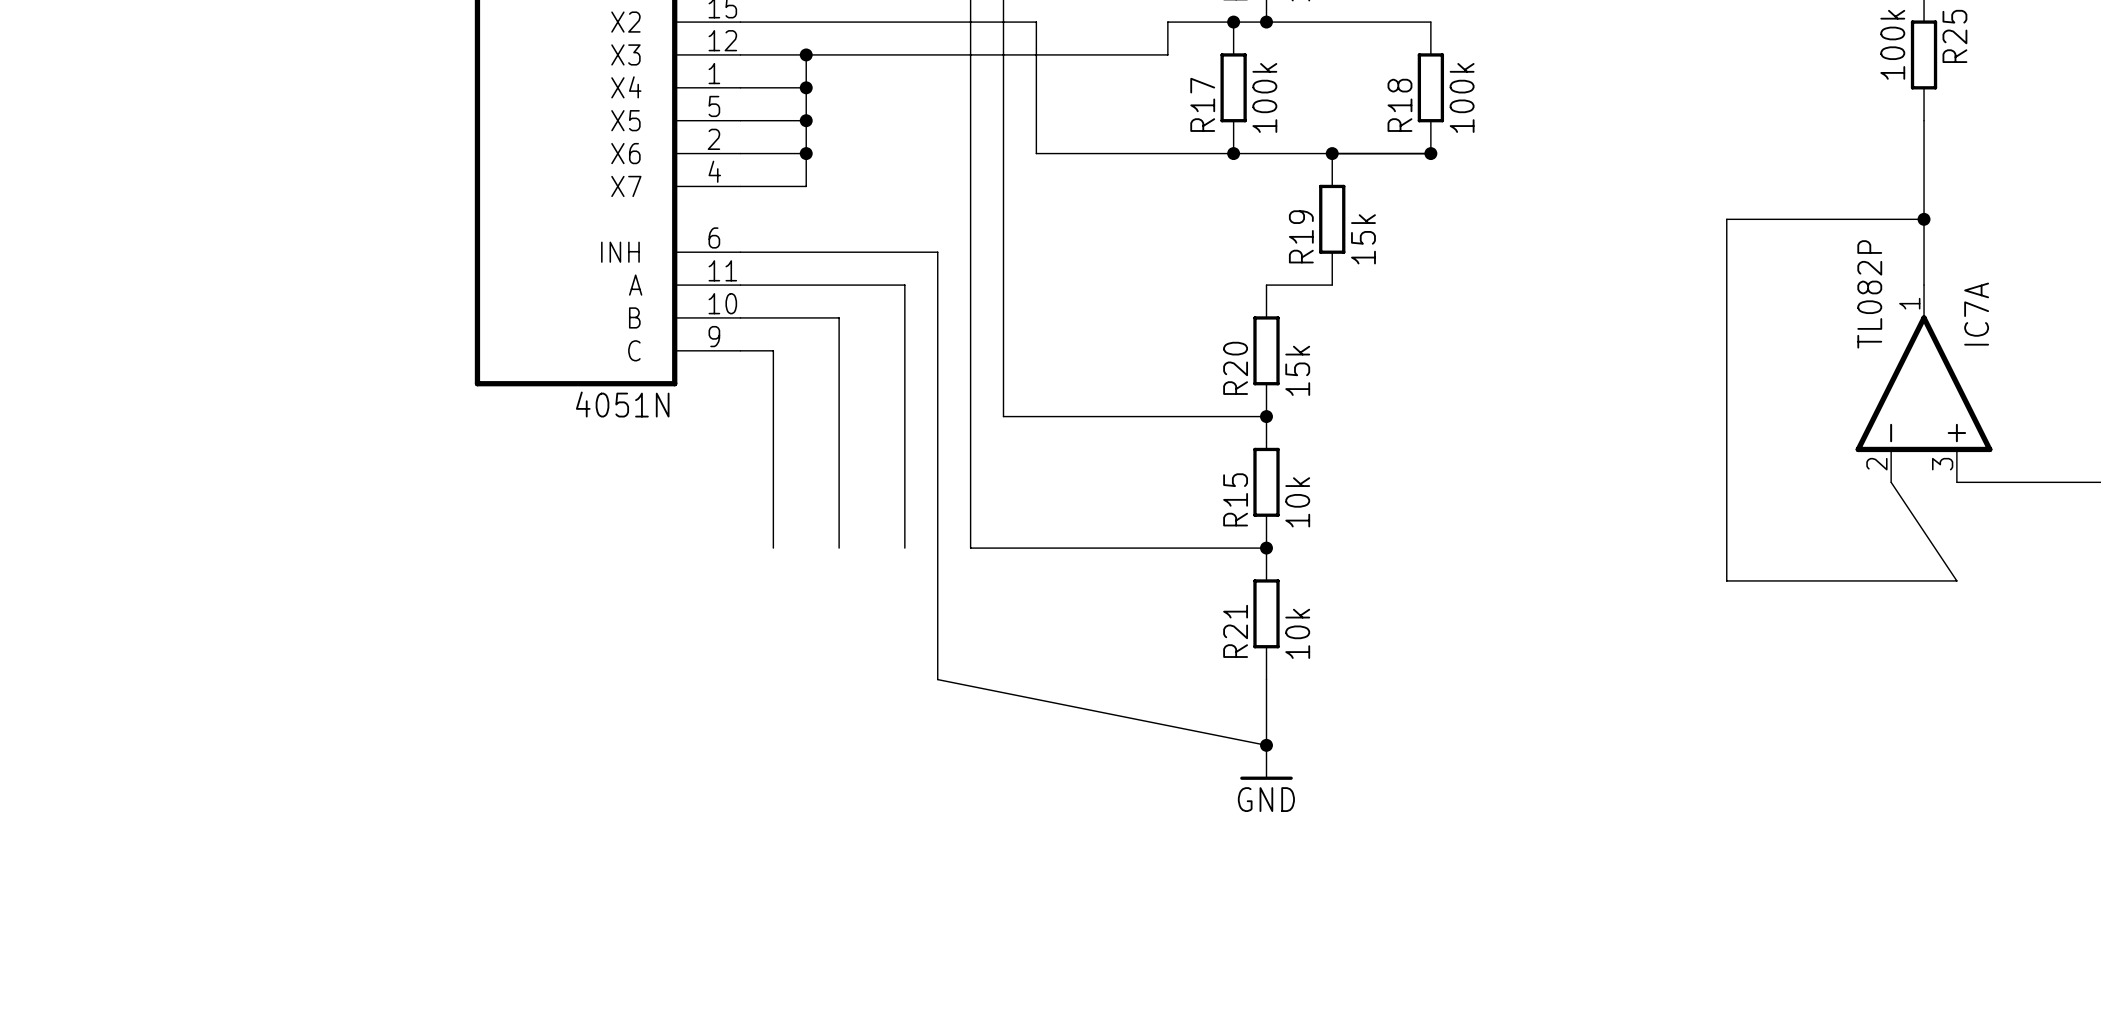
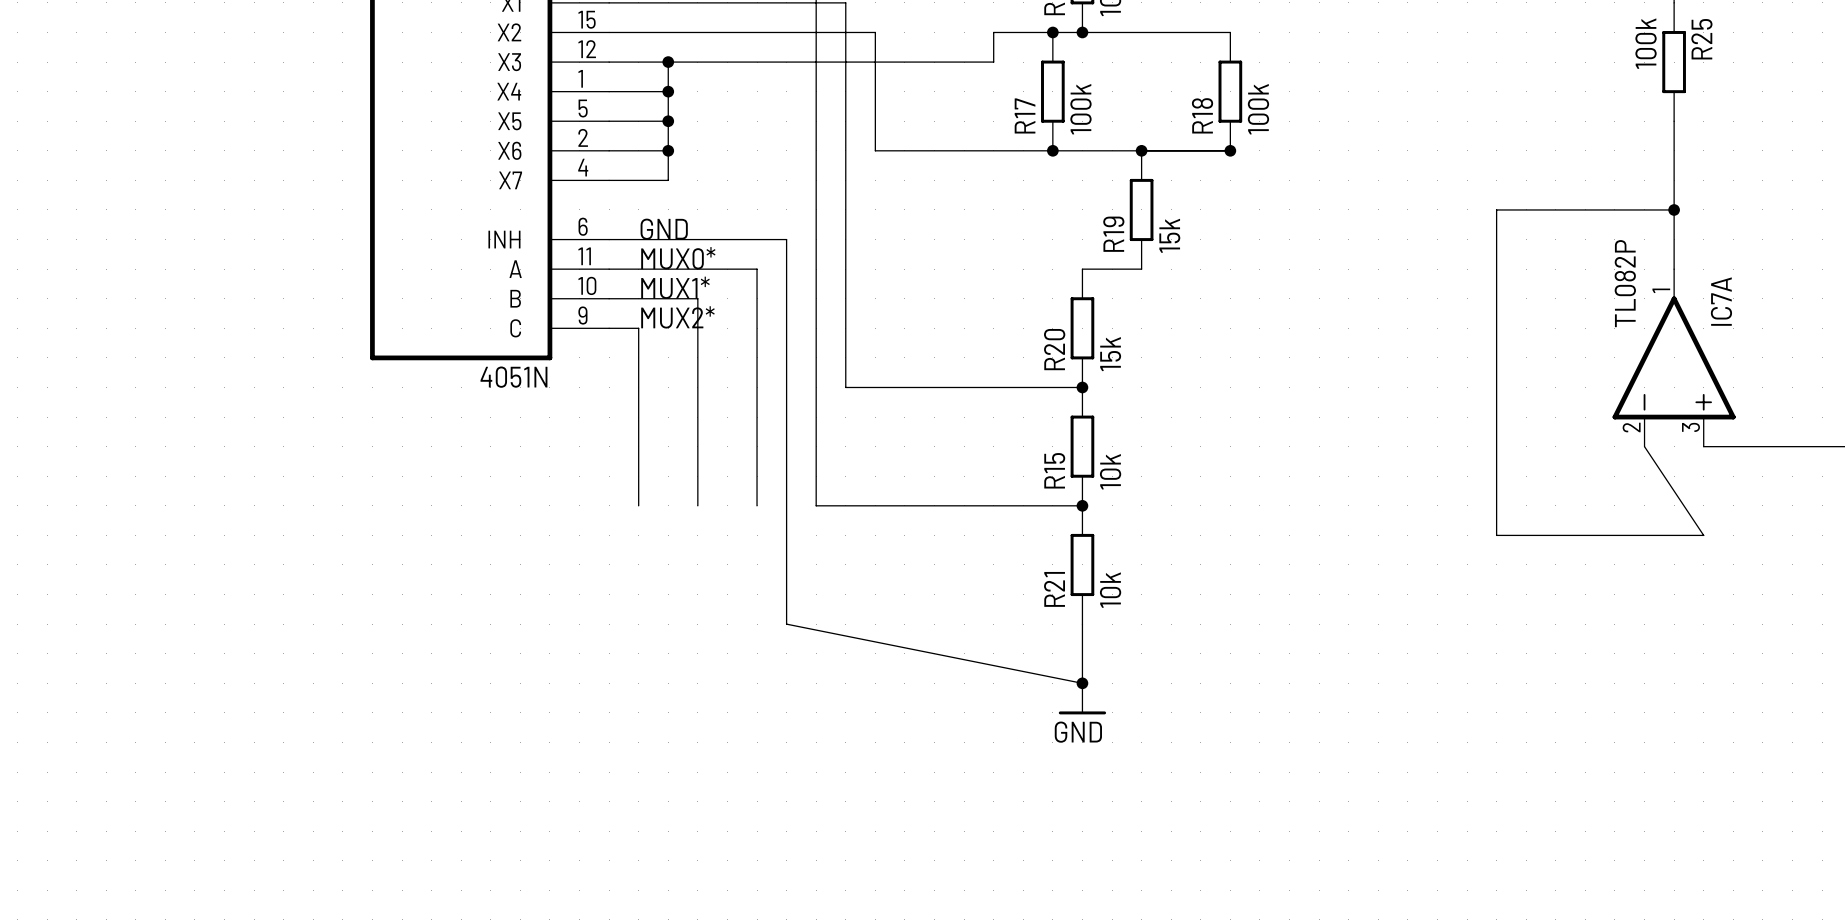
label: none -> GND (664, 229)
label: none -> MUX0* (678, 258)
label: none -> MUX1* (675, 287)
label: none -> MUX2* (677, 317)

